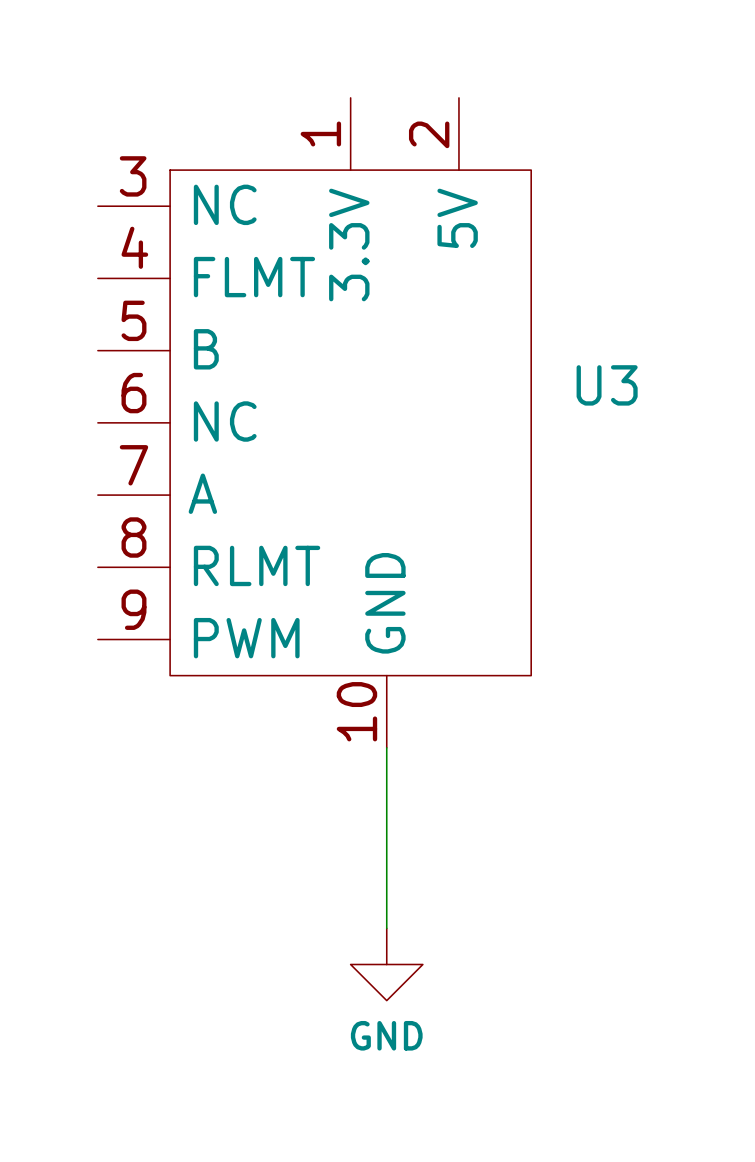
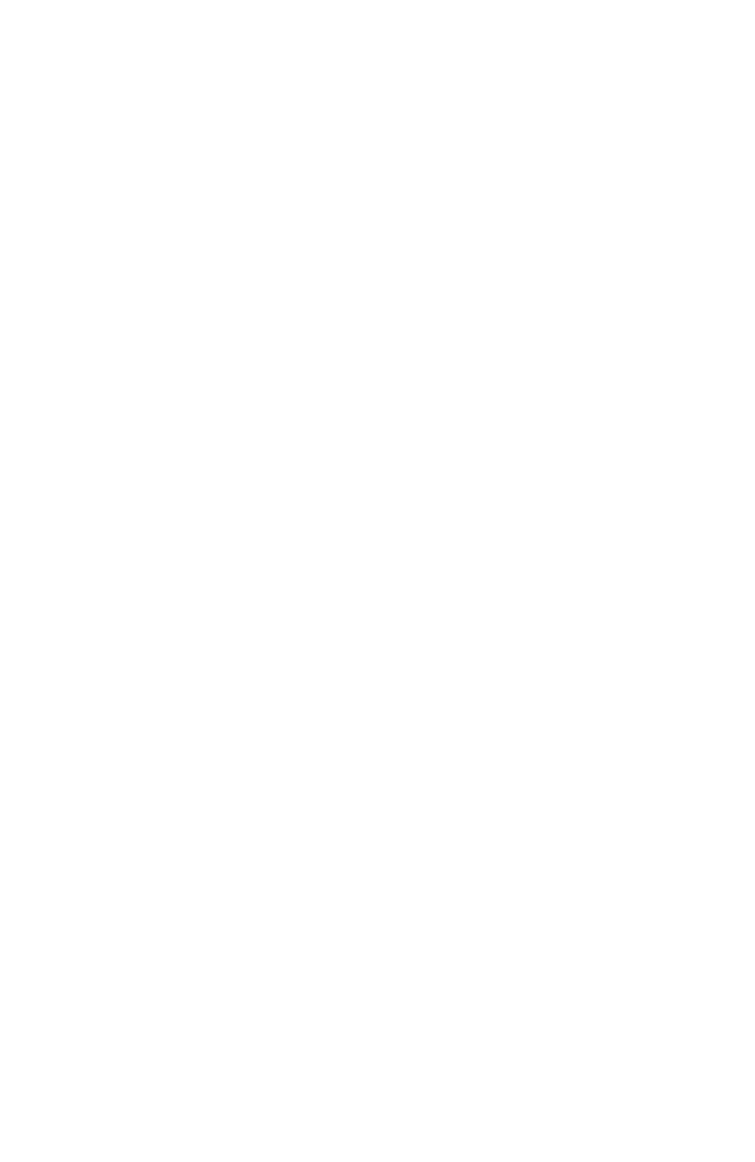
U3: (314, 422) -> none
wire: (386, 747) (386, 928) -> none
power symbol: GND (386, 964) -> none

